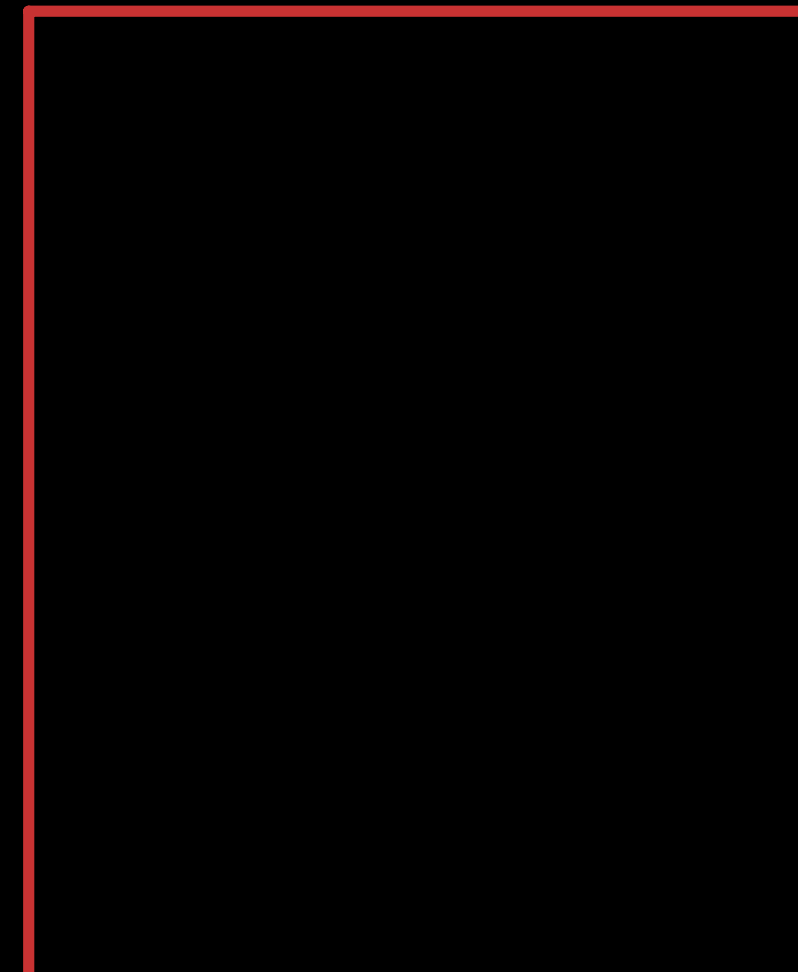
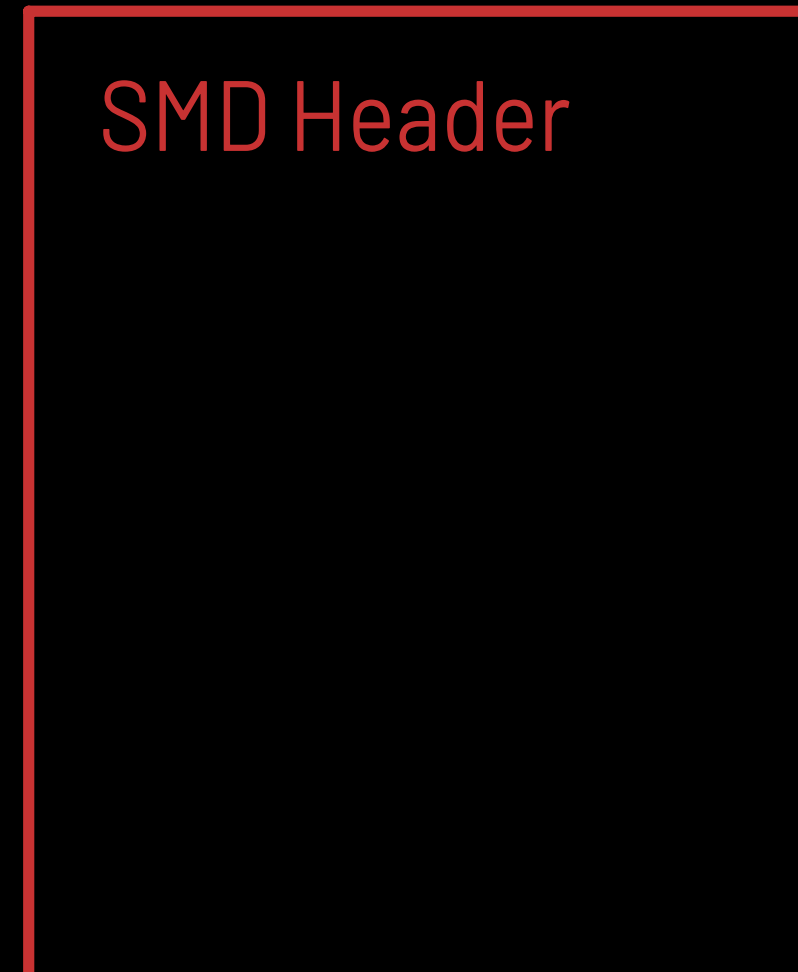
text: none -> SMD Header (336, 116)

